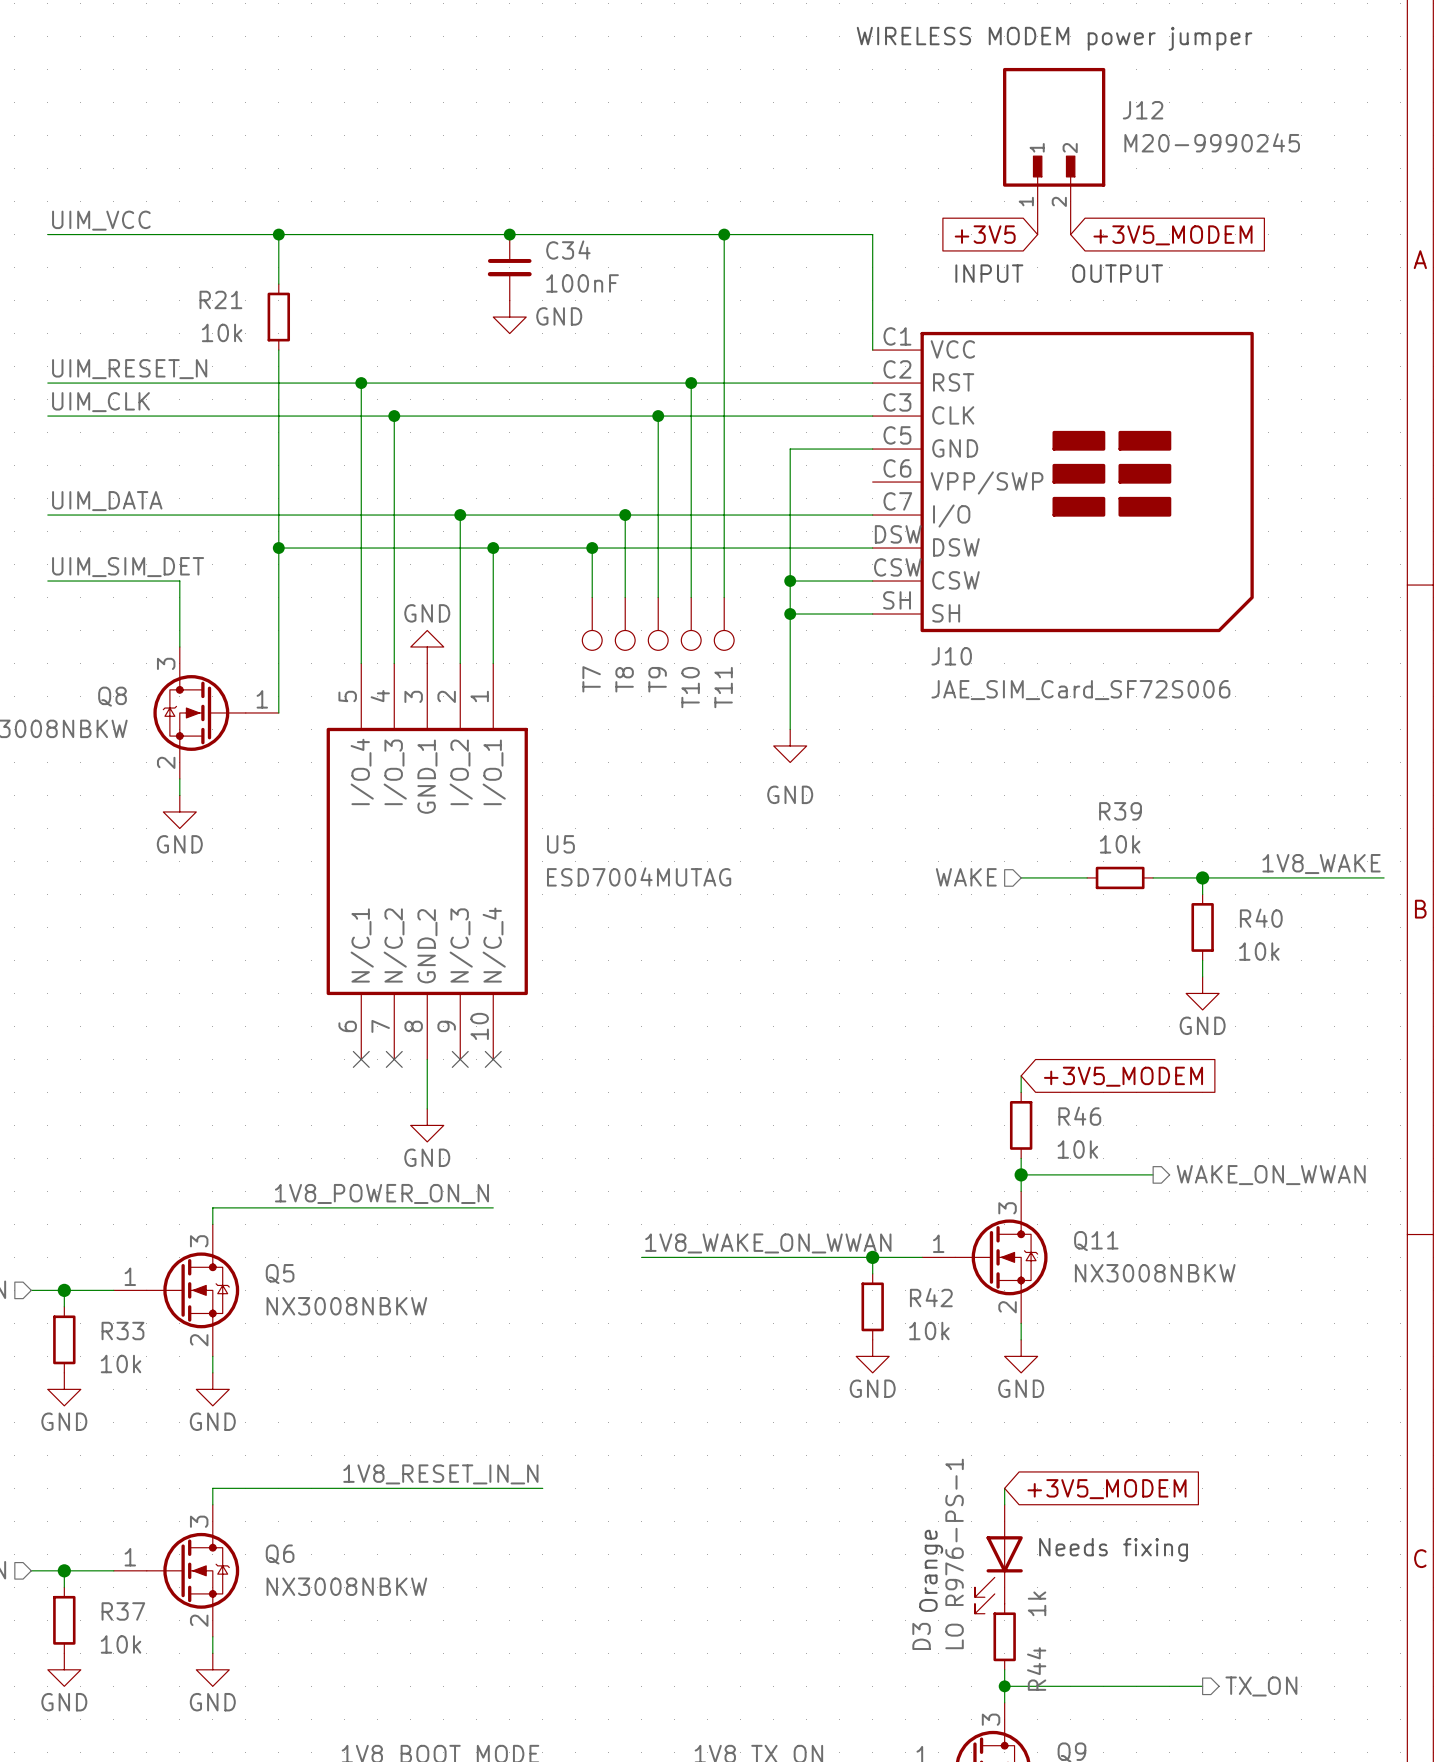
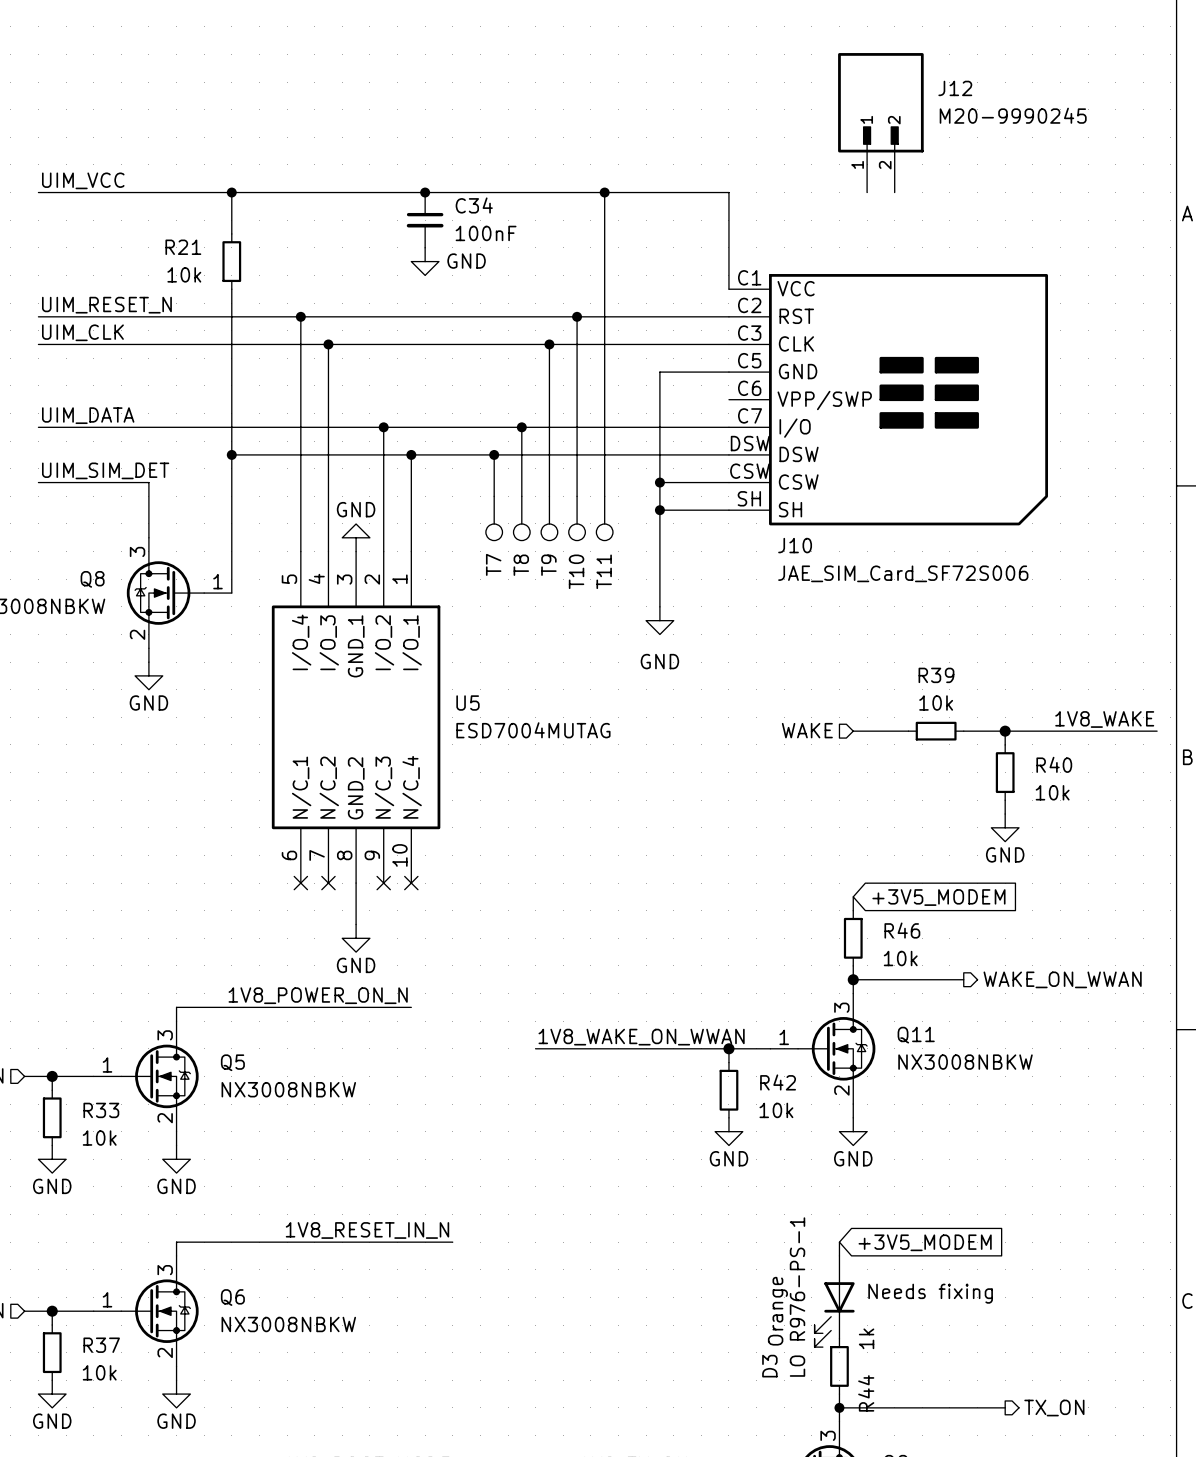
text: WIRELESS MODEM power jumper (1054, 38) -> none
global label: +3V5 (985, 234) -> none
global label: +3V5_MODEM (1173, 235) -> none
text: INPUT (989, 273) -> none
text: OUTPUT (1117, 273) -> none

